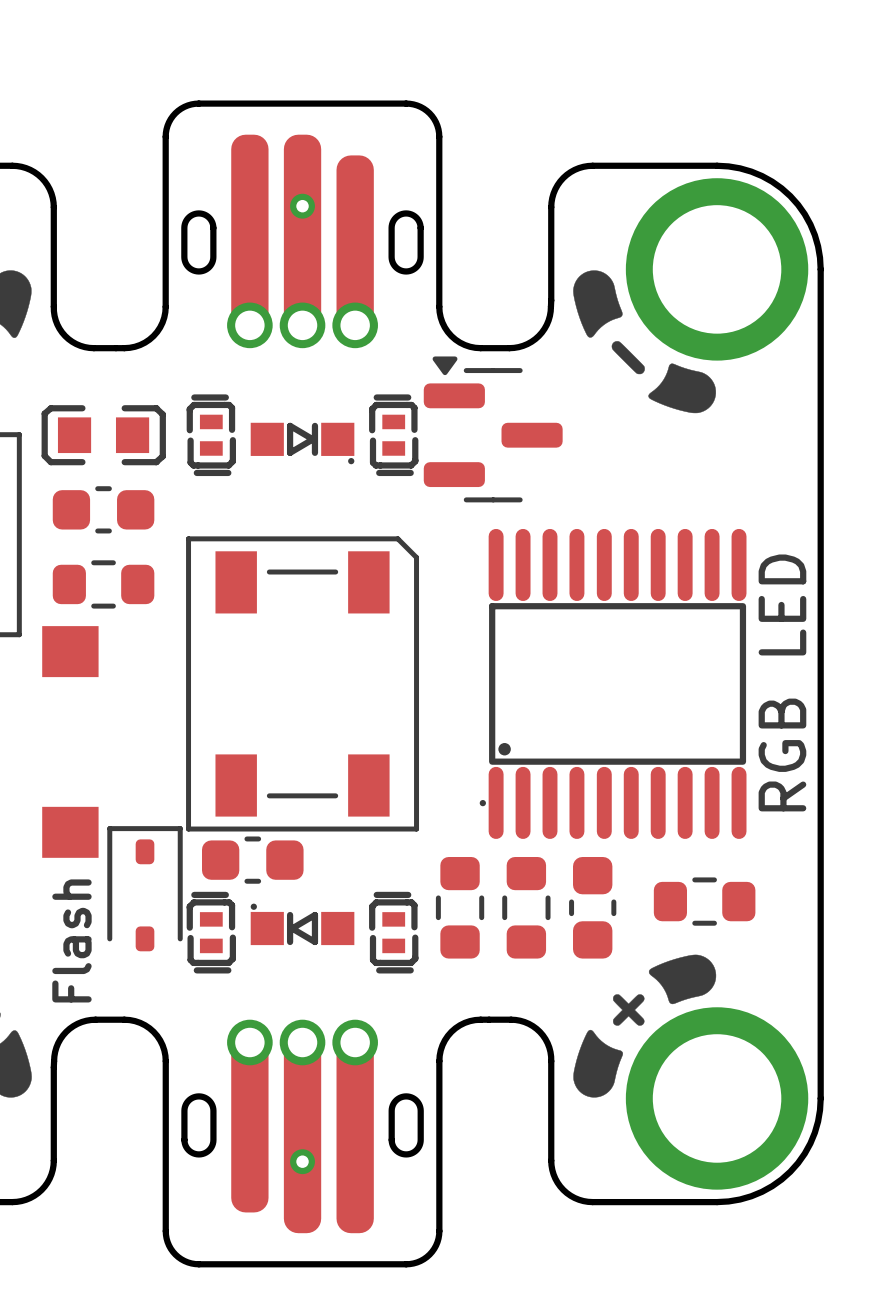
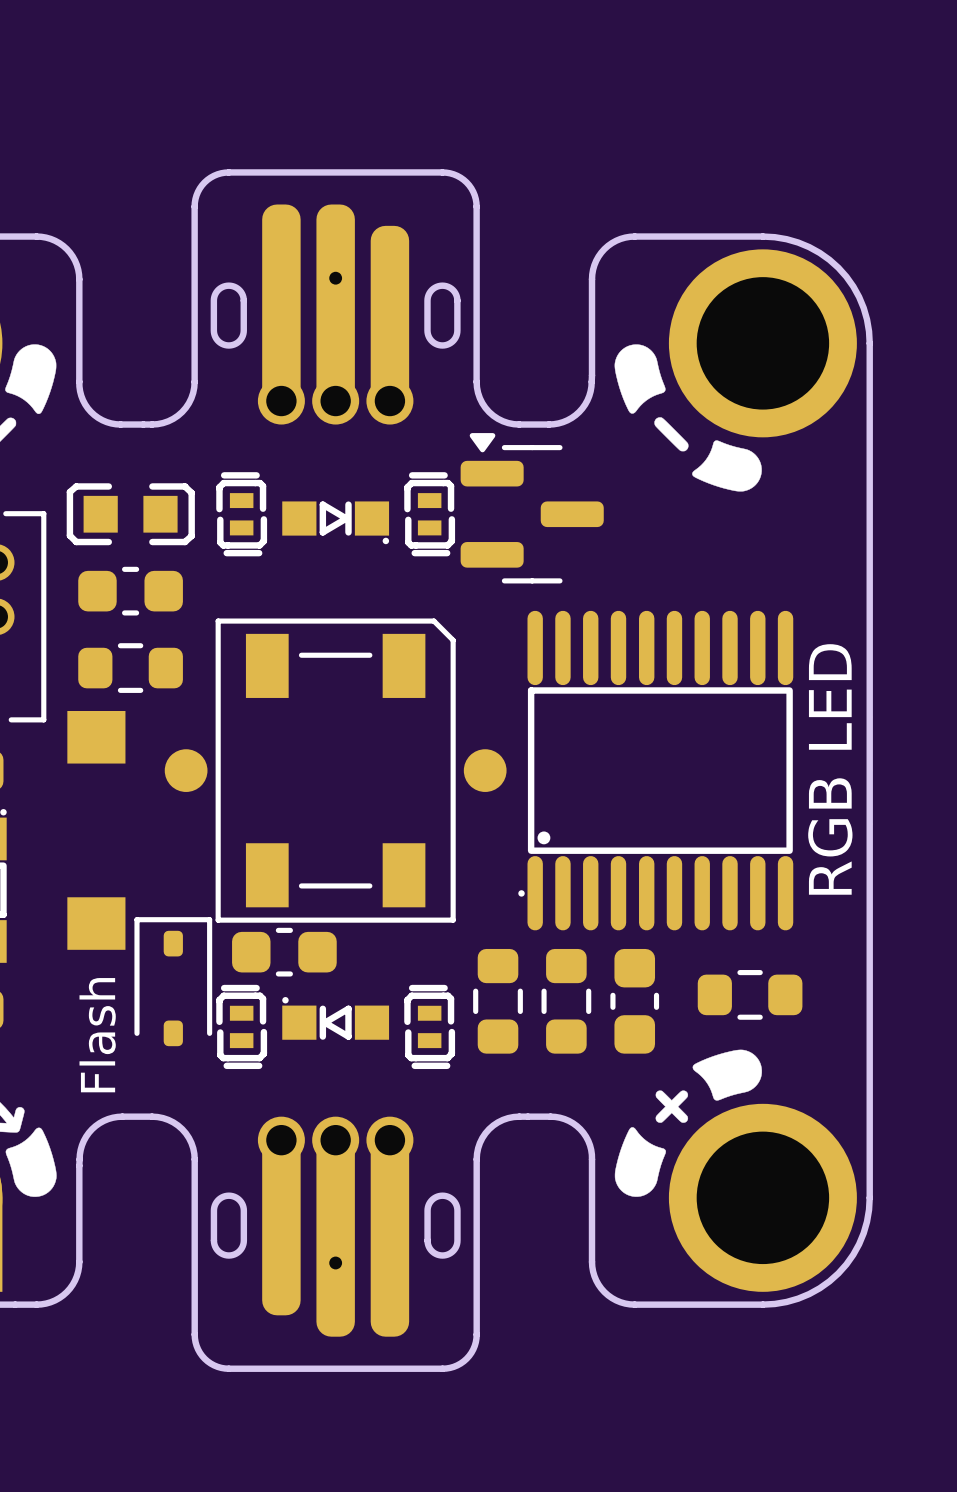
part: none -> (186, 770)
part: none -> (485, 770)

